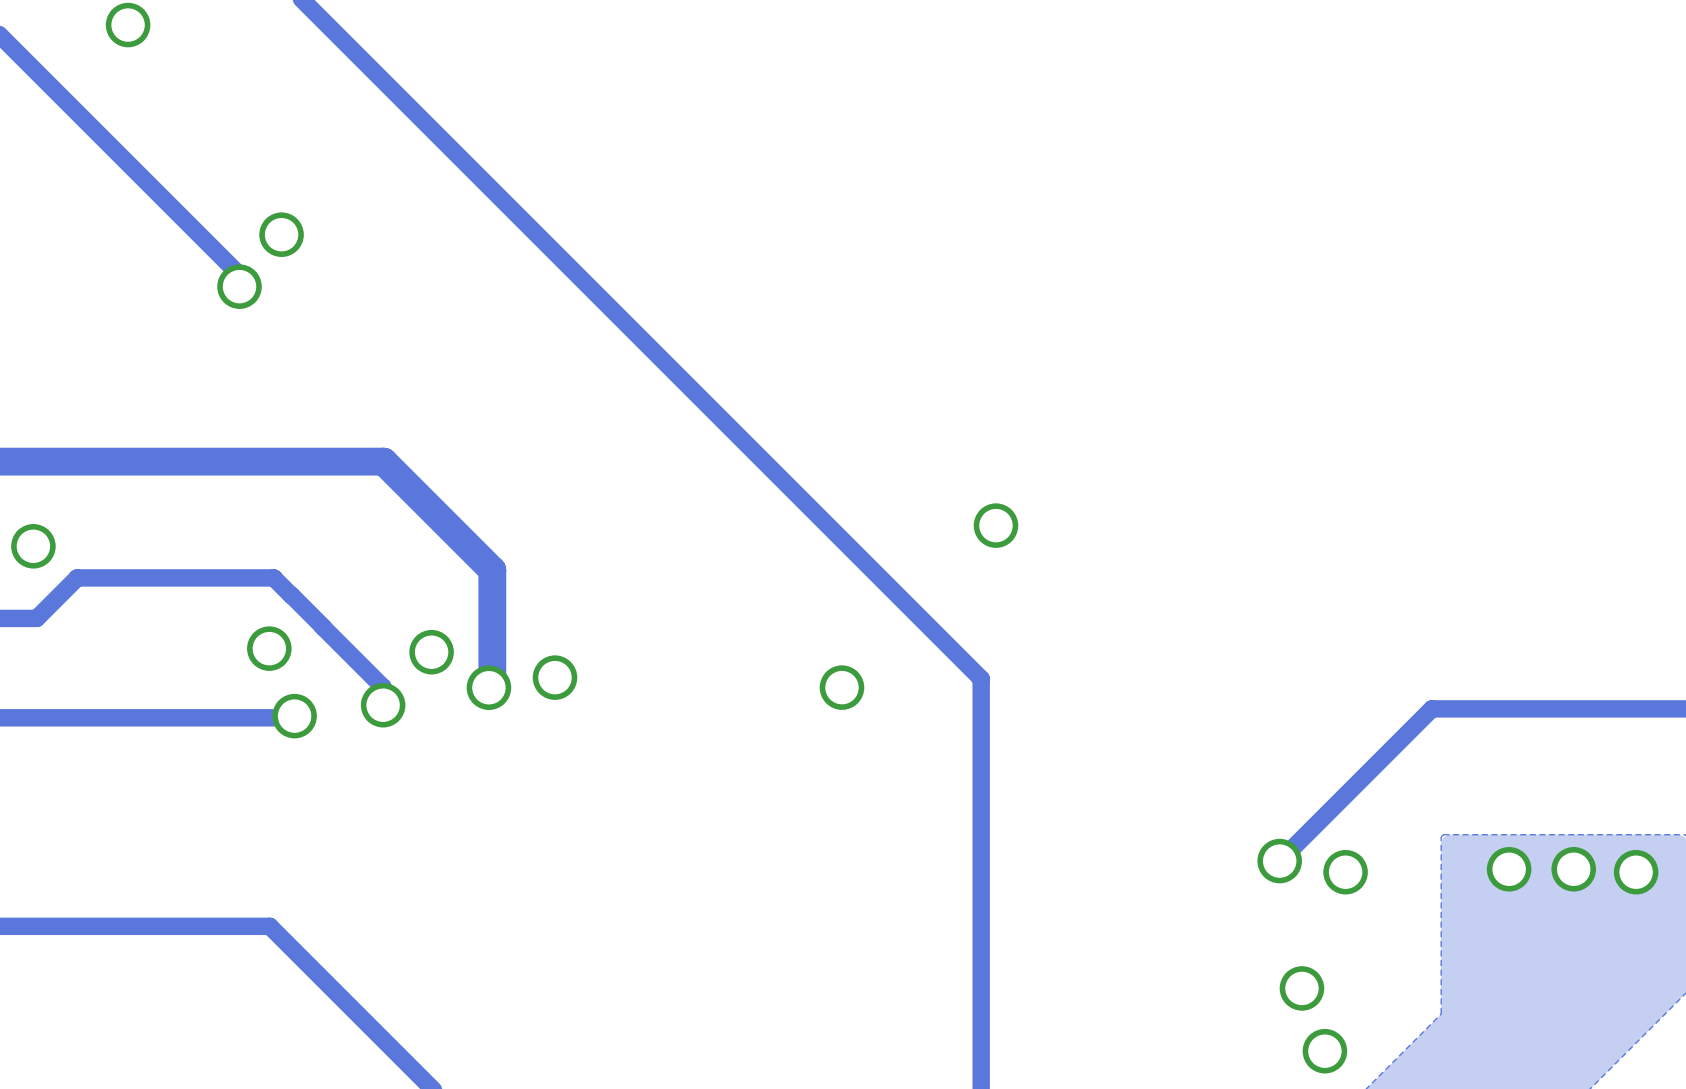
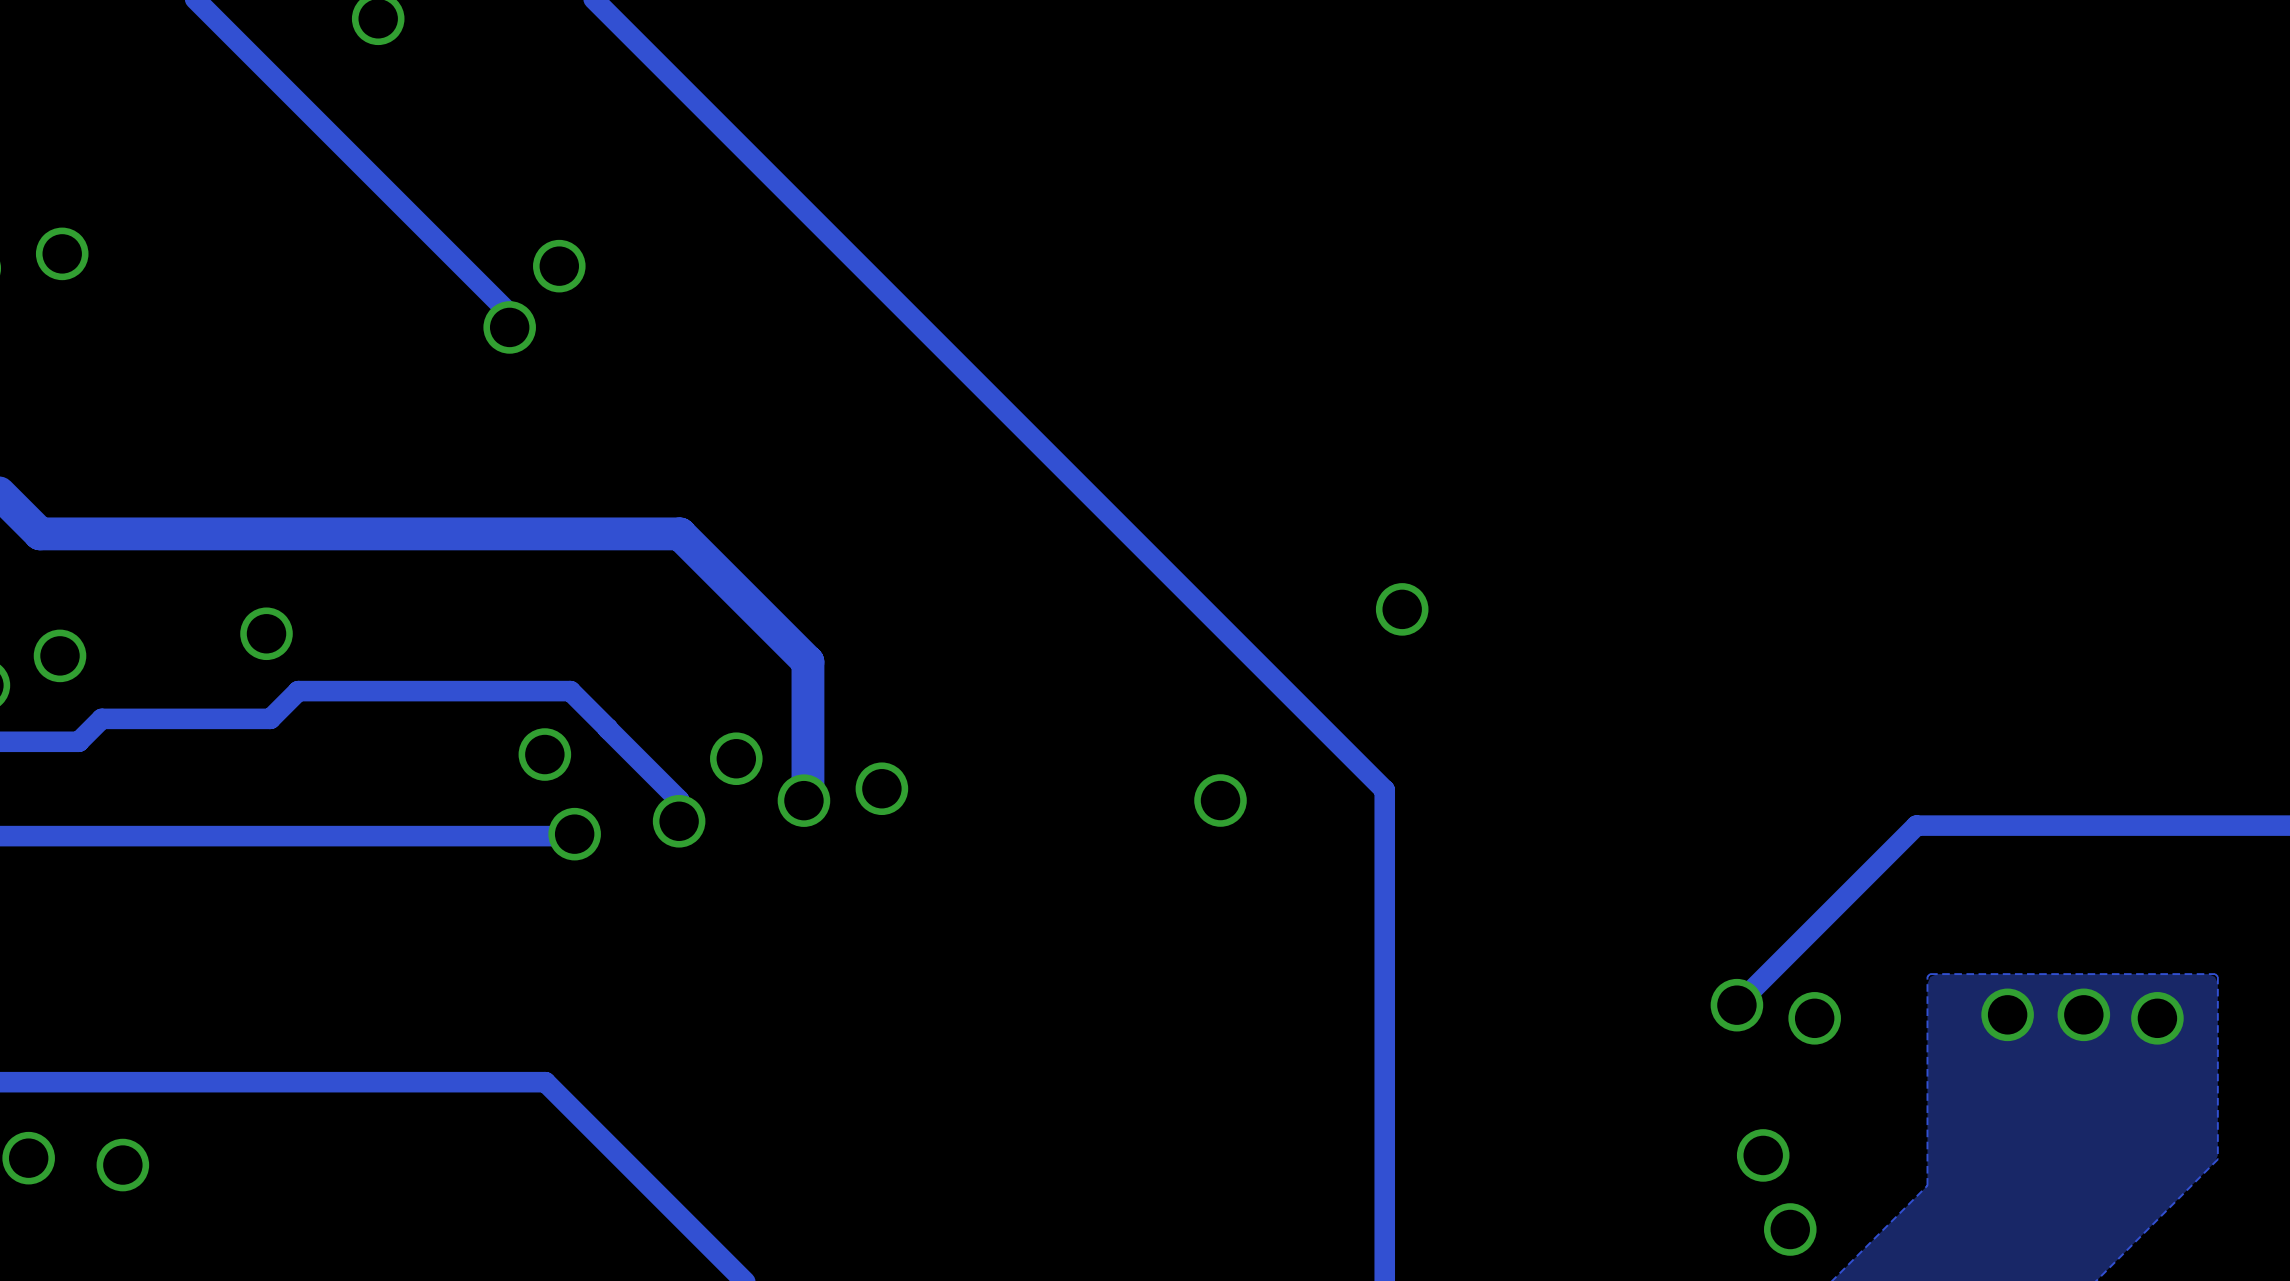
track: (291, 594) (273, 577) (77, 577) (60, 594) -> (570, 691) (298, 691)

